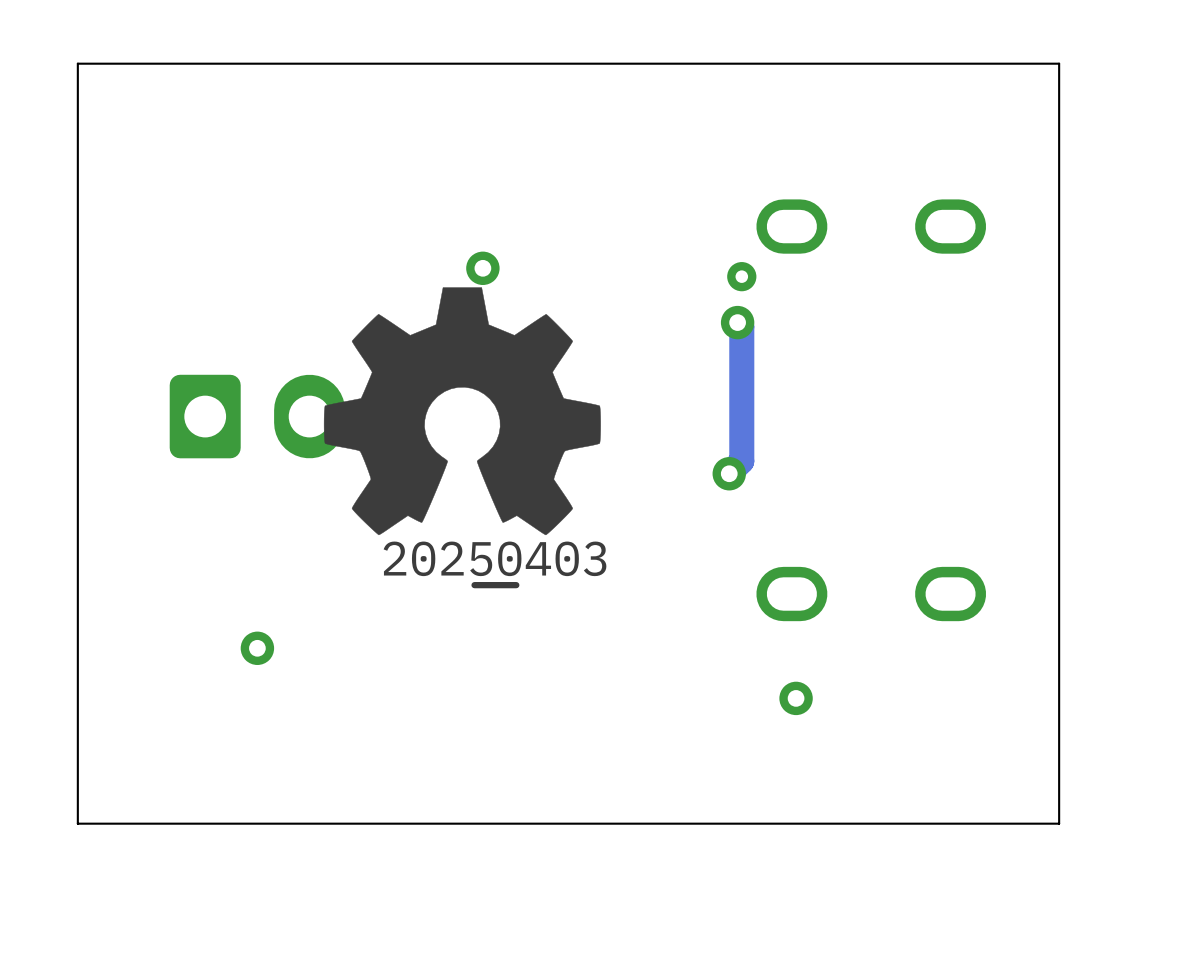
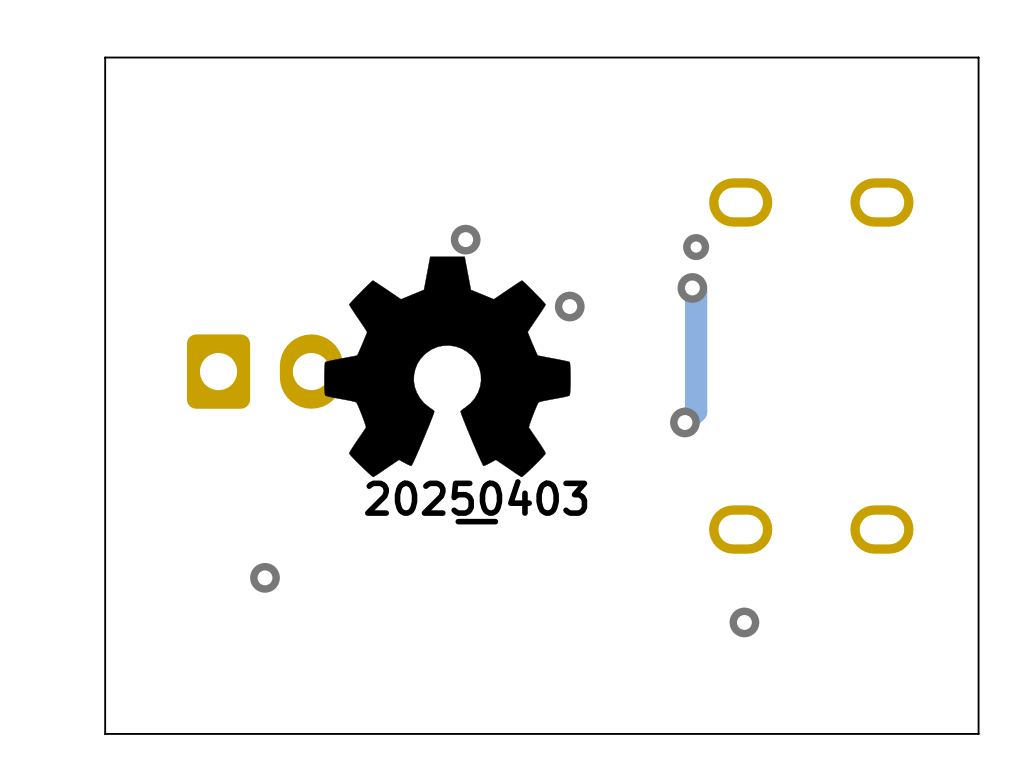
via: none -> (569, 306)

